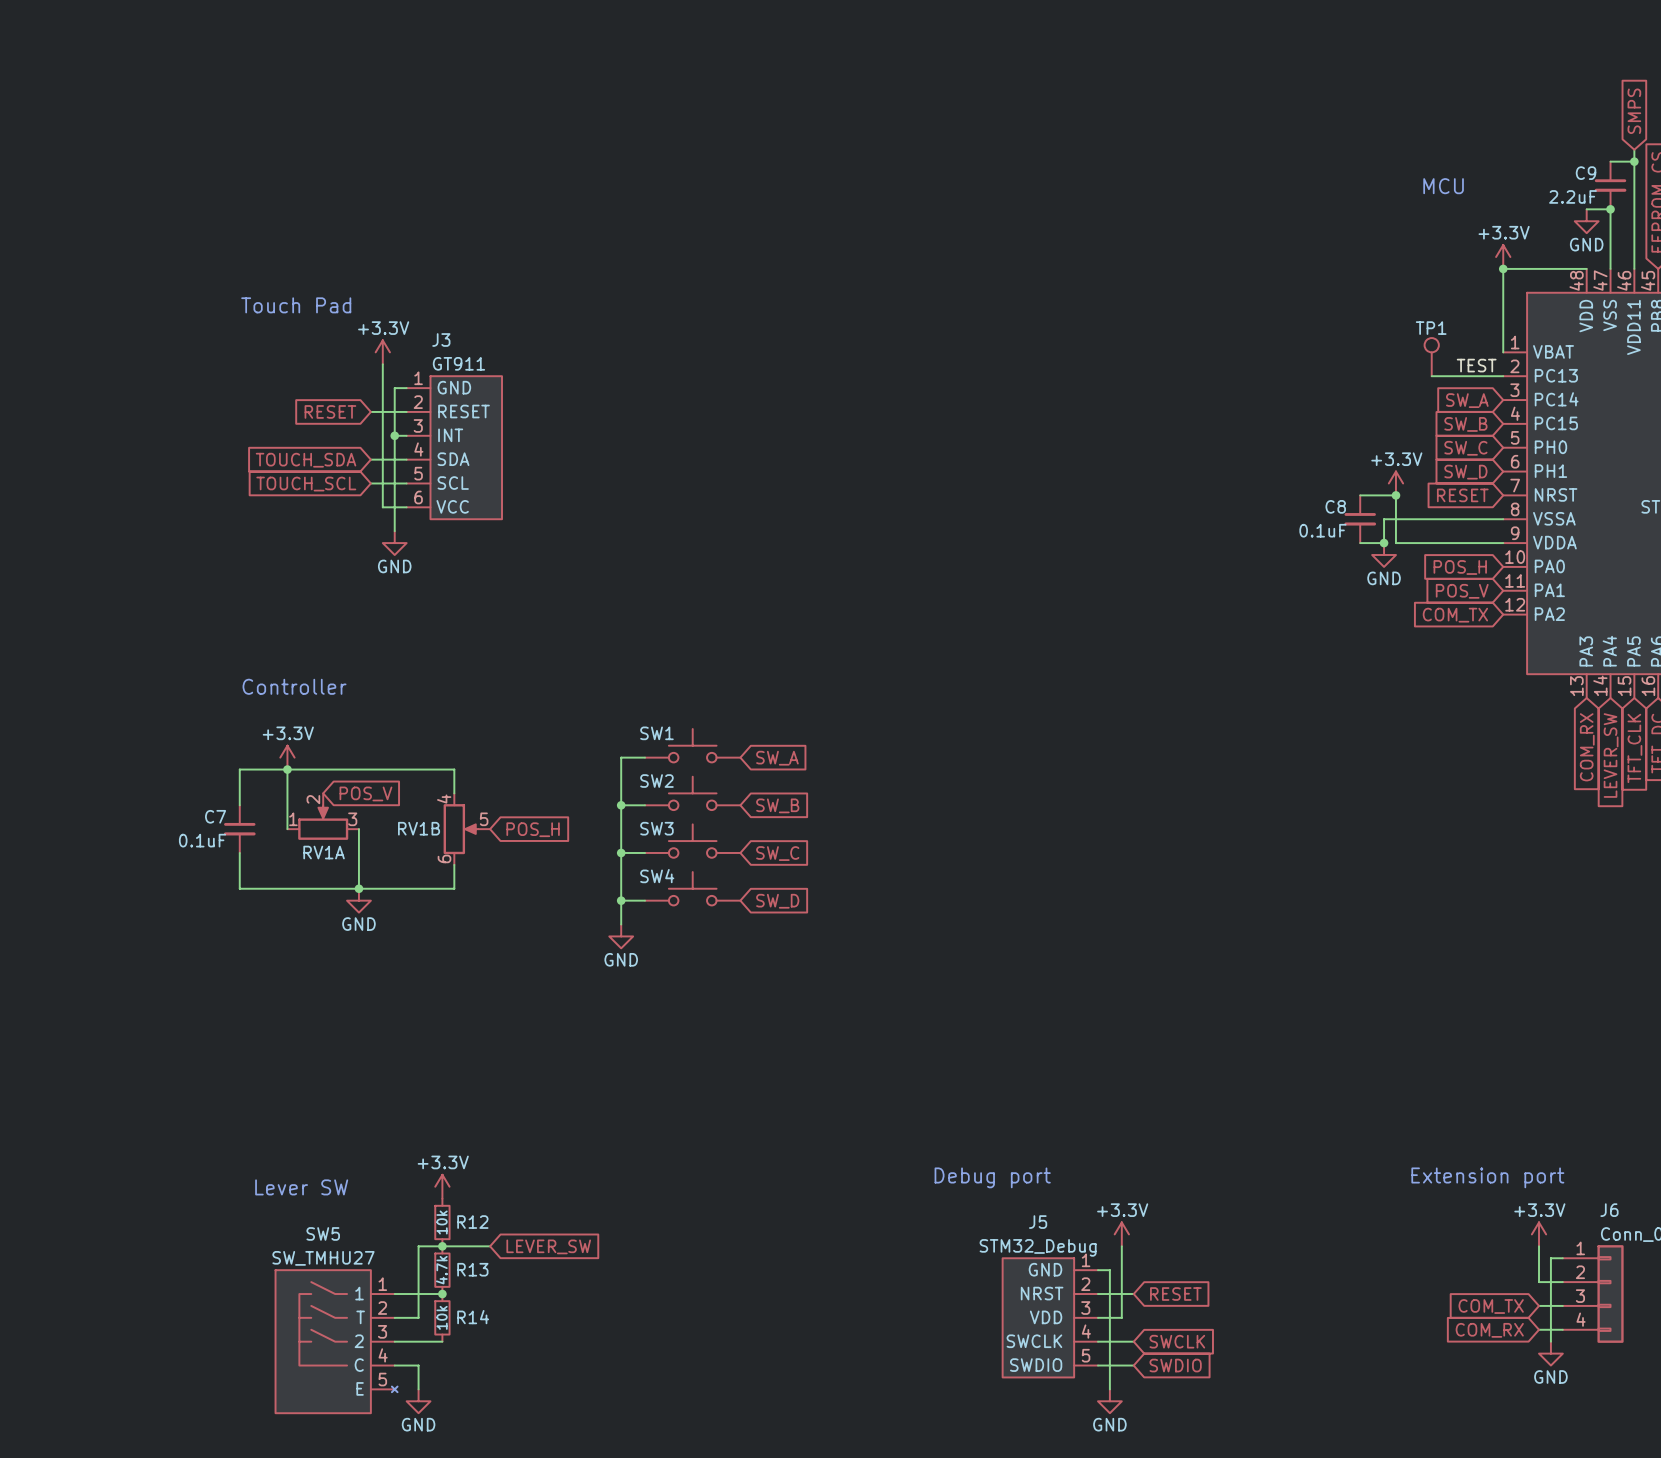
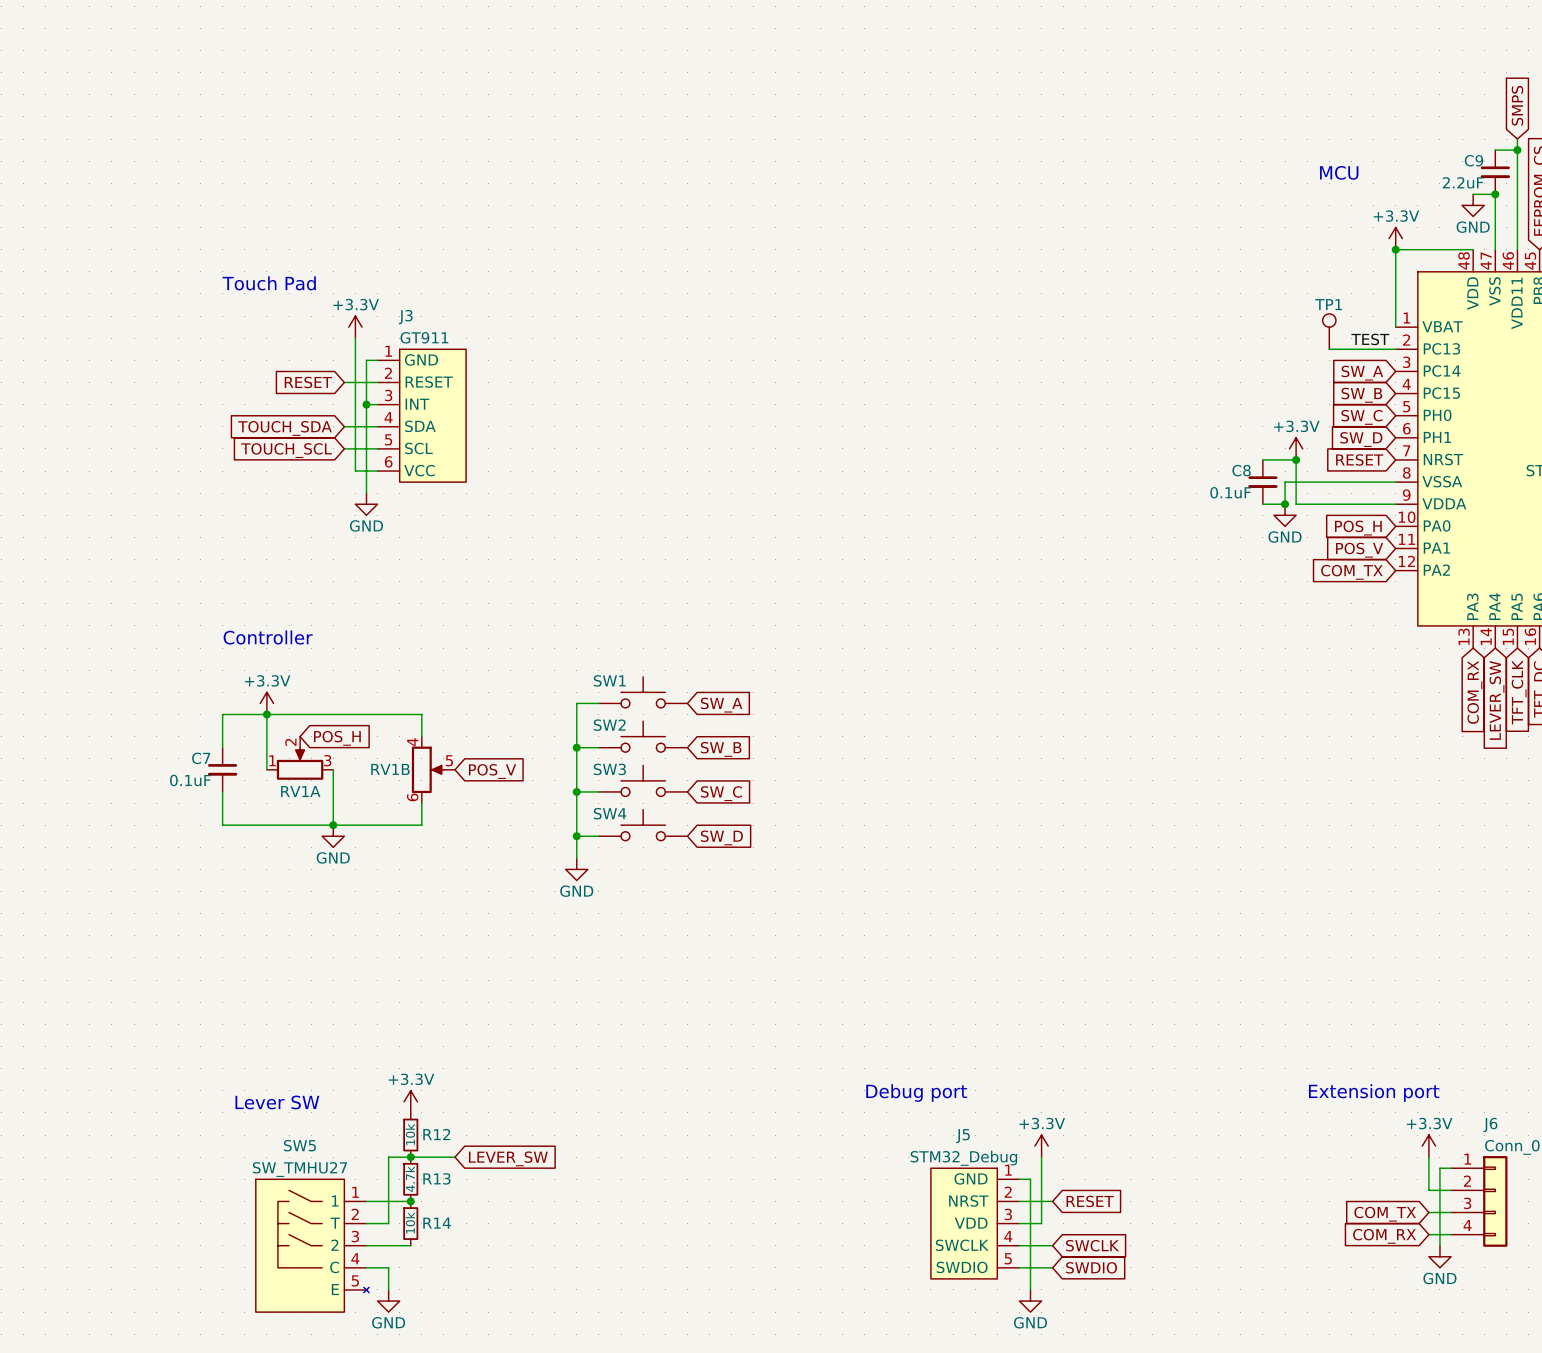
global label: POS_V (365, 793) -> POS_H (337, 738)
global label: POS_H (533, 829) -> POS_V (492, 771)

